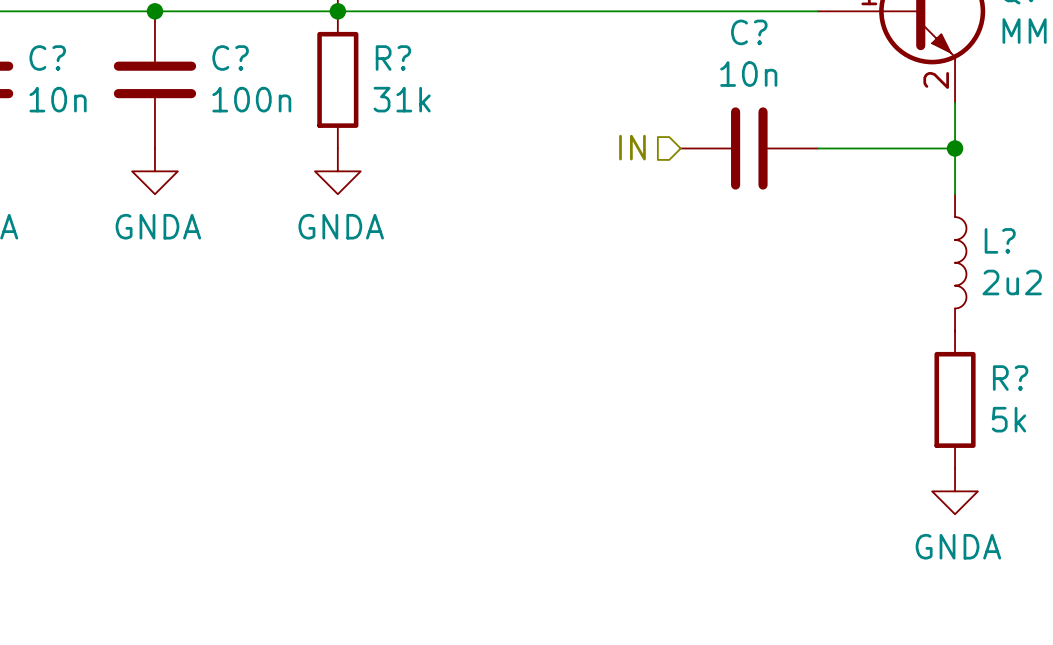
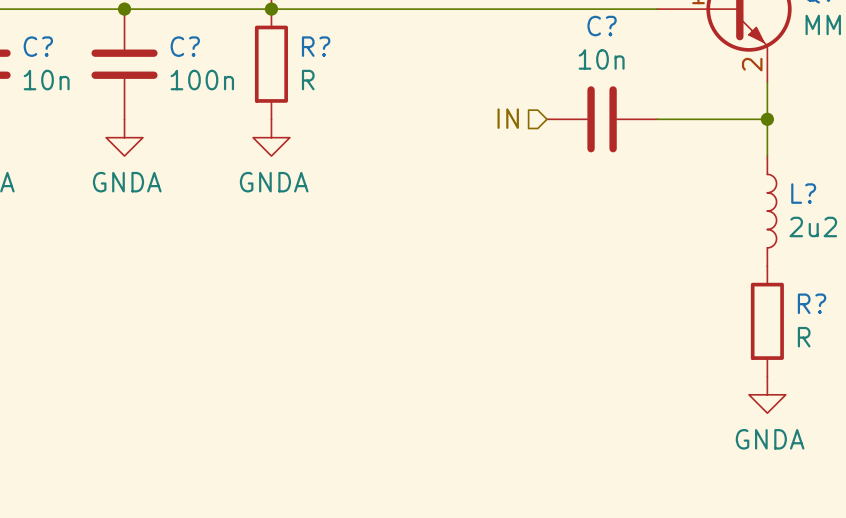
R? value: 31k (402, 99) -> R (308, 80)
R? value: 5k (1008, 419) -> R (804, 337)

